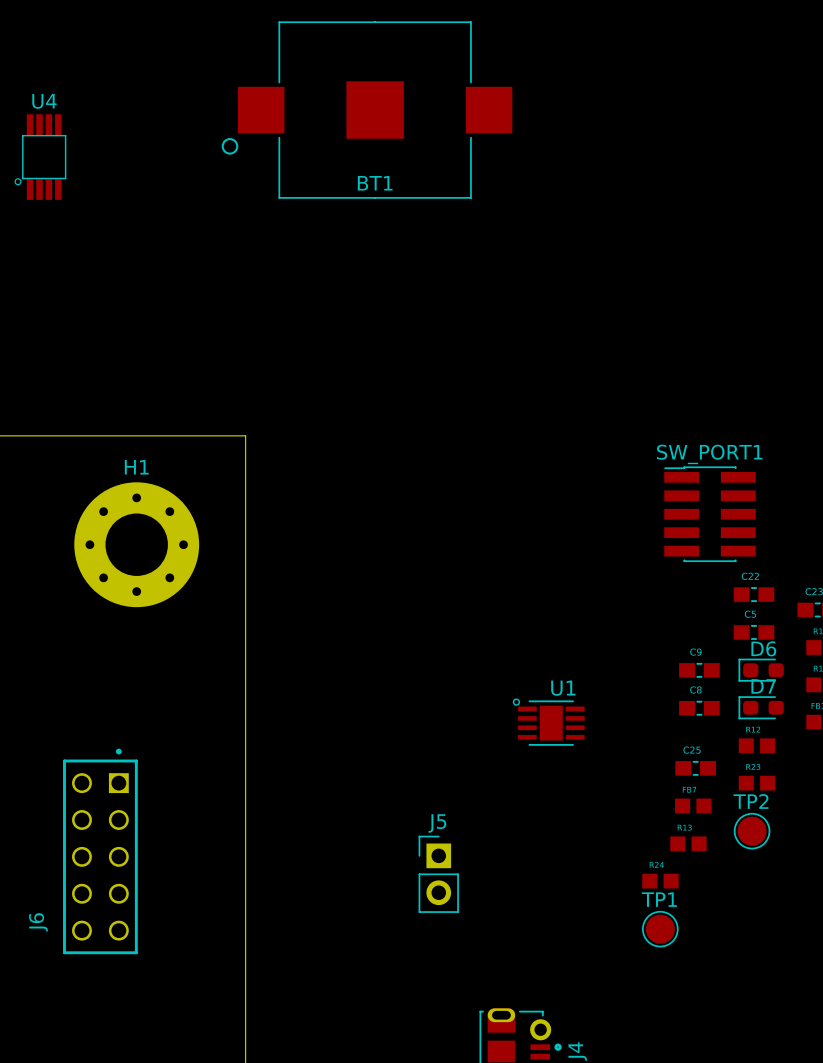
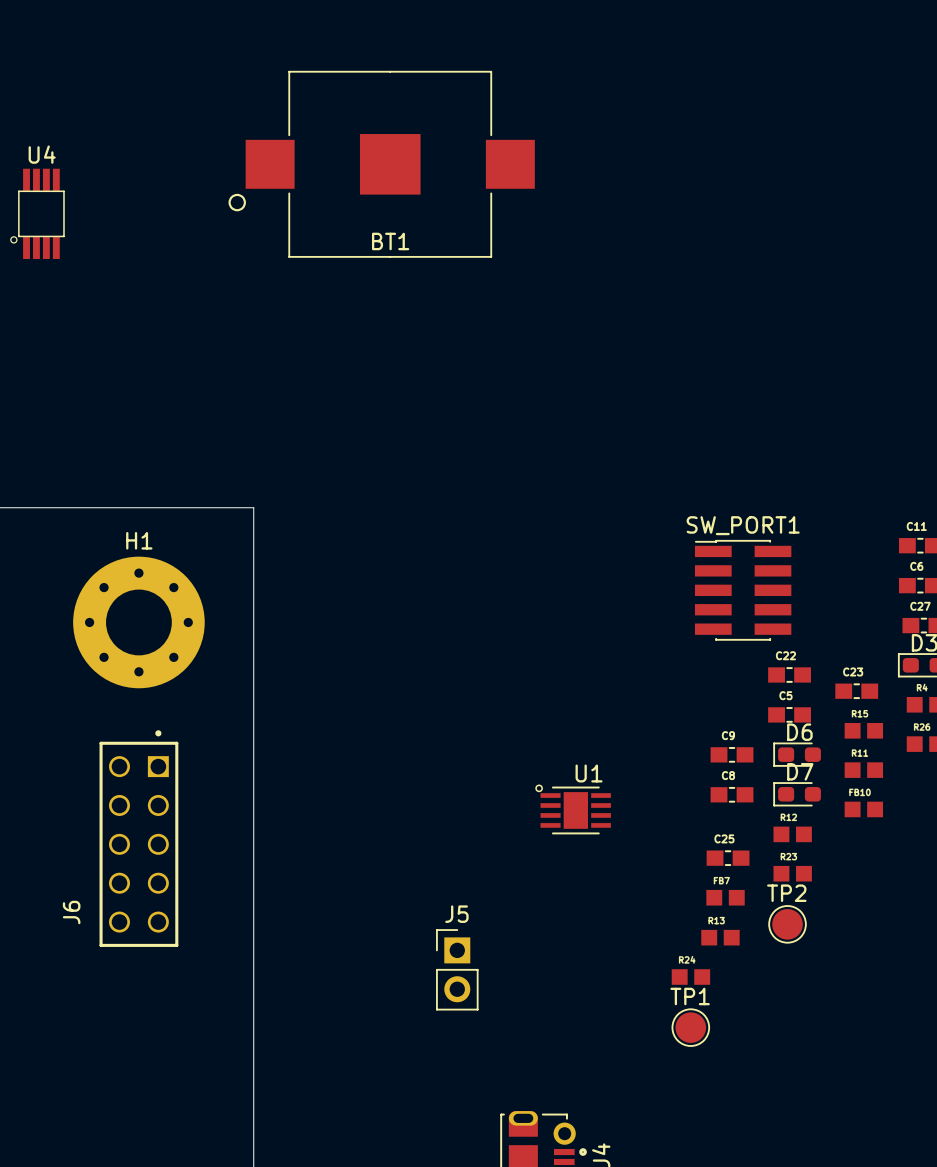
J6 position: (100, 851) -> (138, 838)

